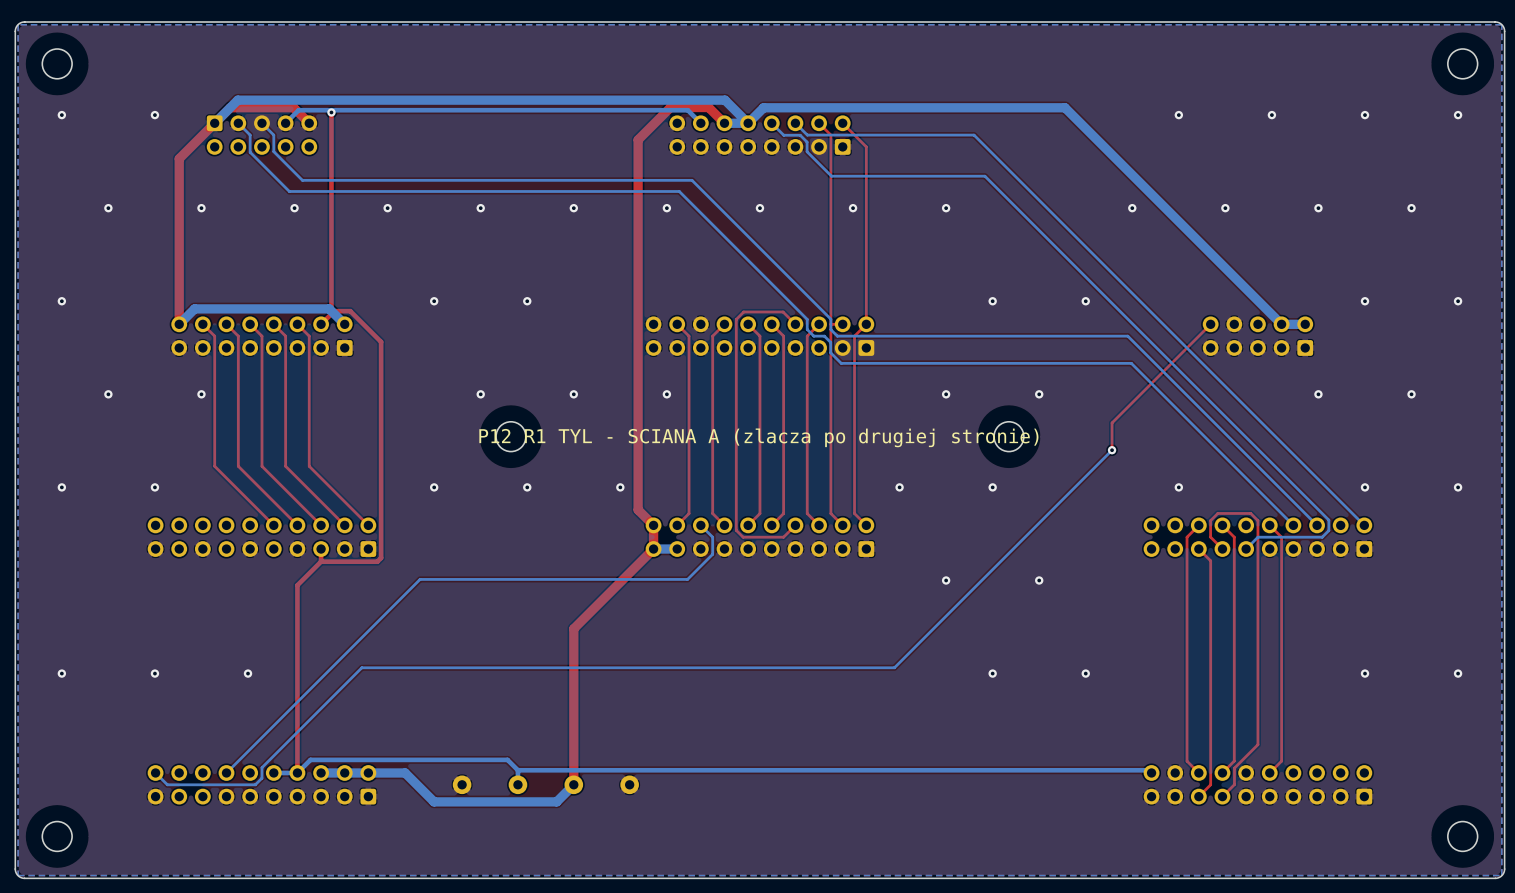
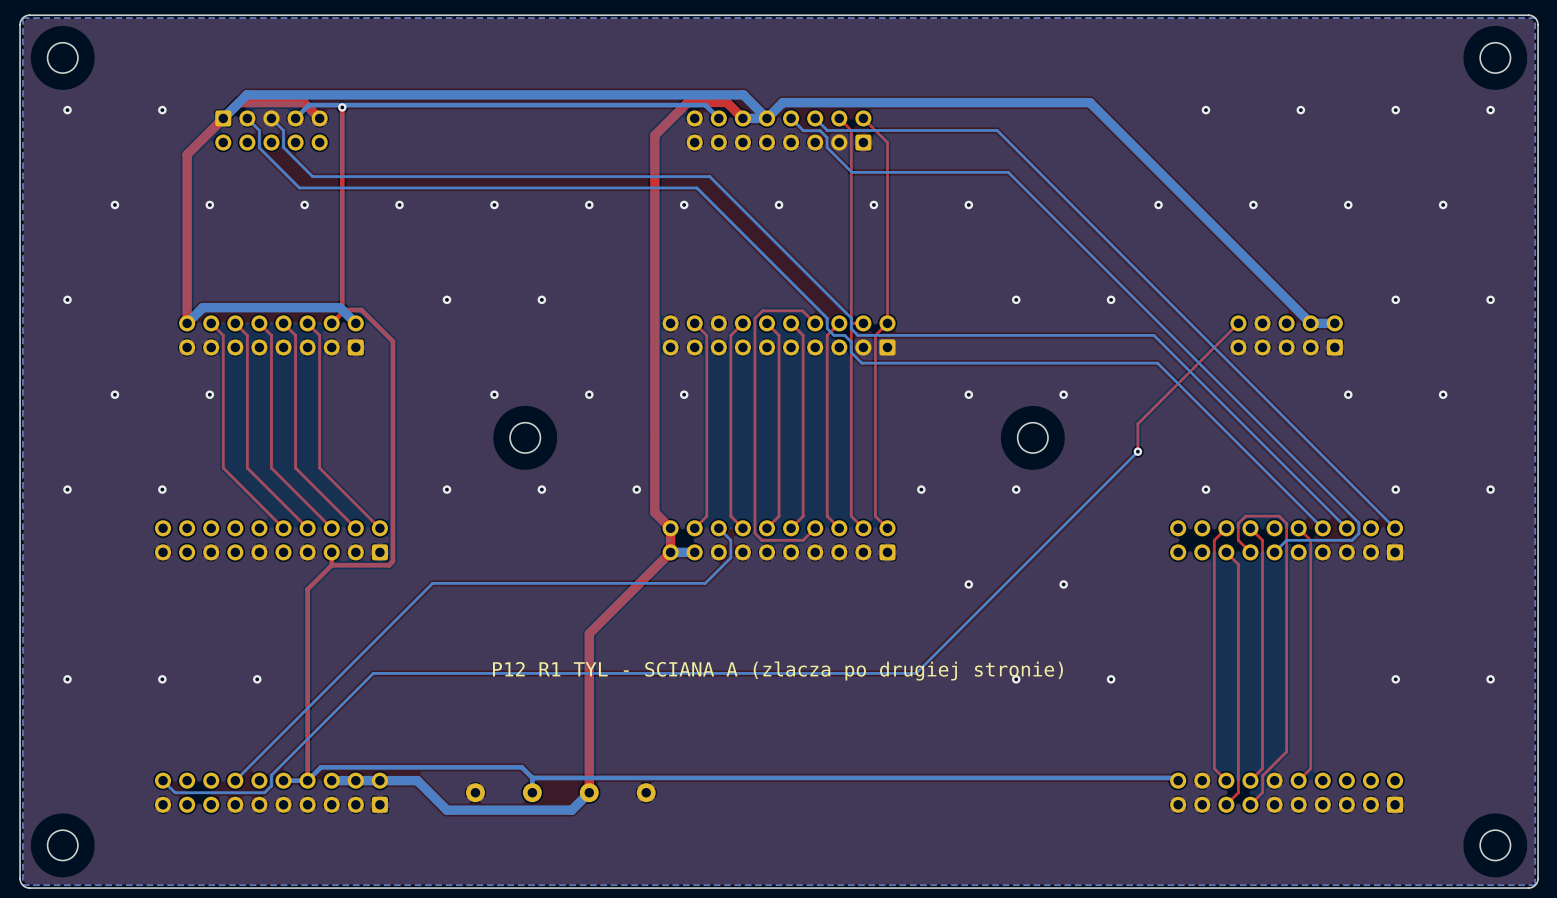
text position: P12 R1 TYL - SCIANA A (zlacza po drugiej stronie) (758, 437) -> P12 R1 TYL - SCIANA A (zlacza po drugiej stronie) (777, 671)

